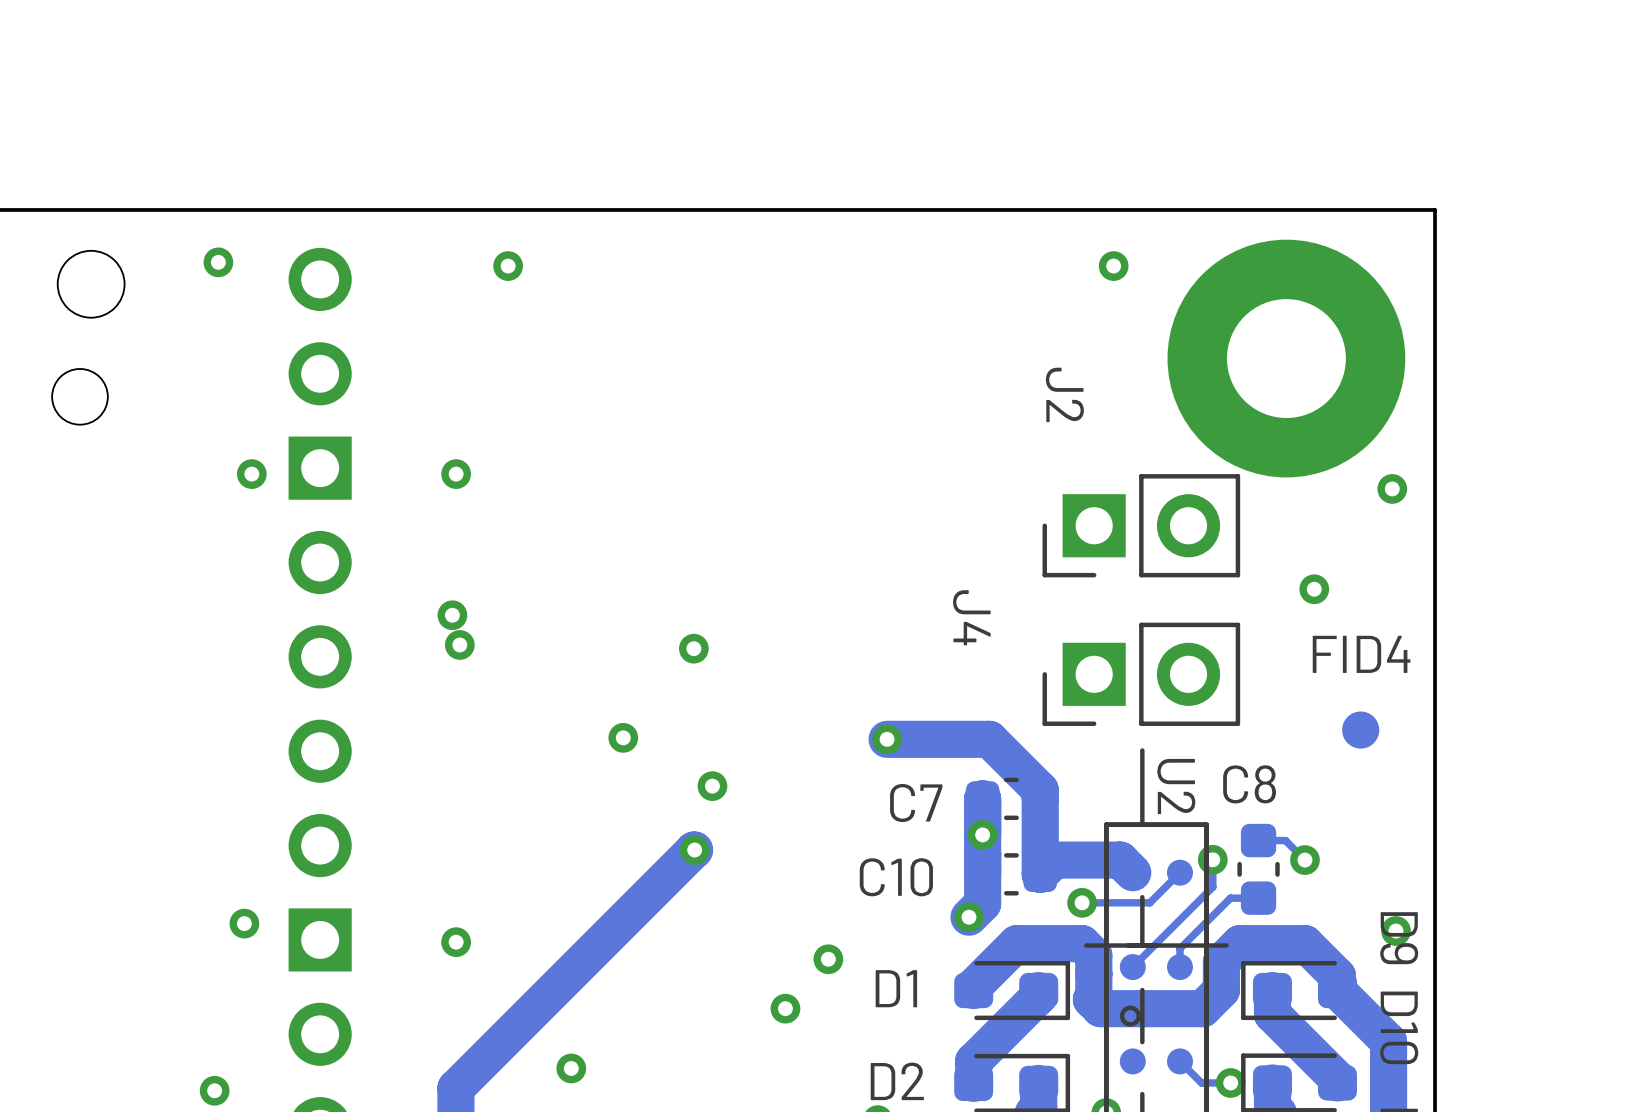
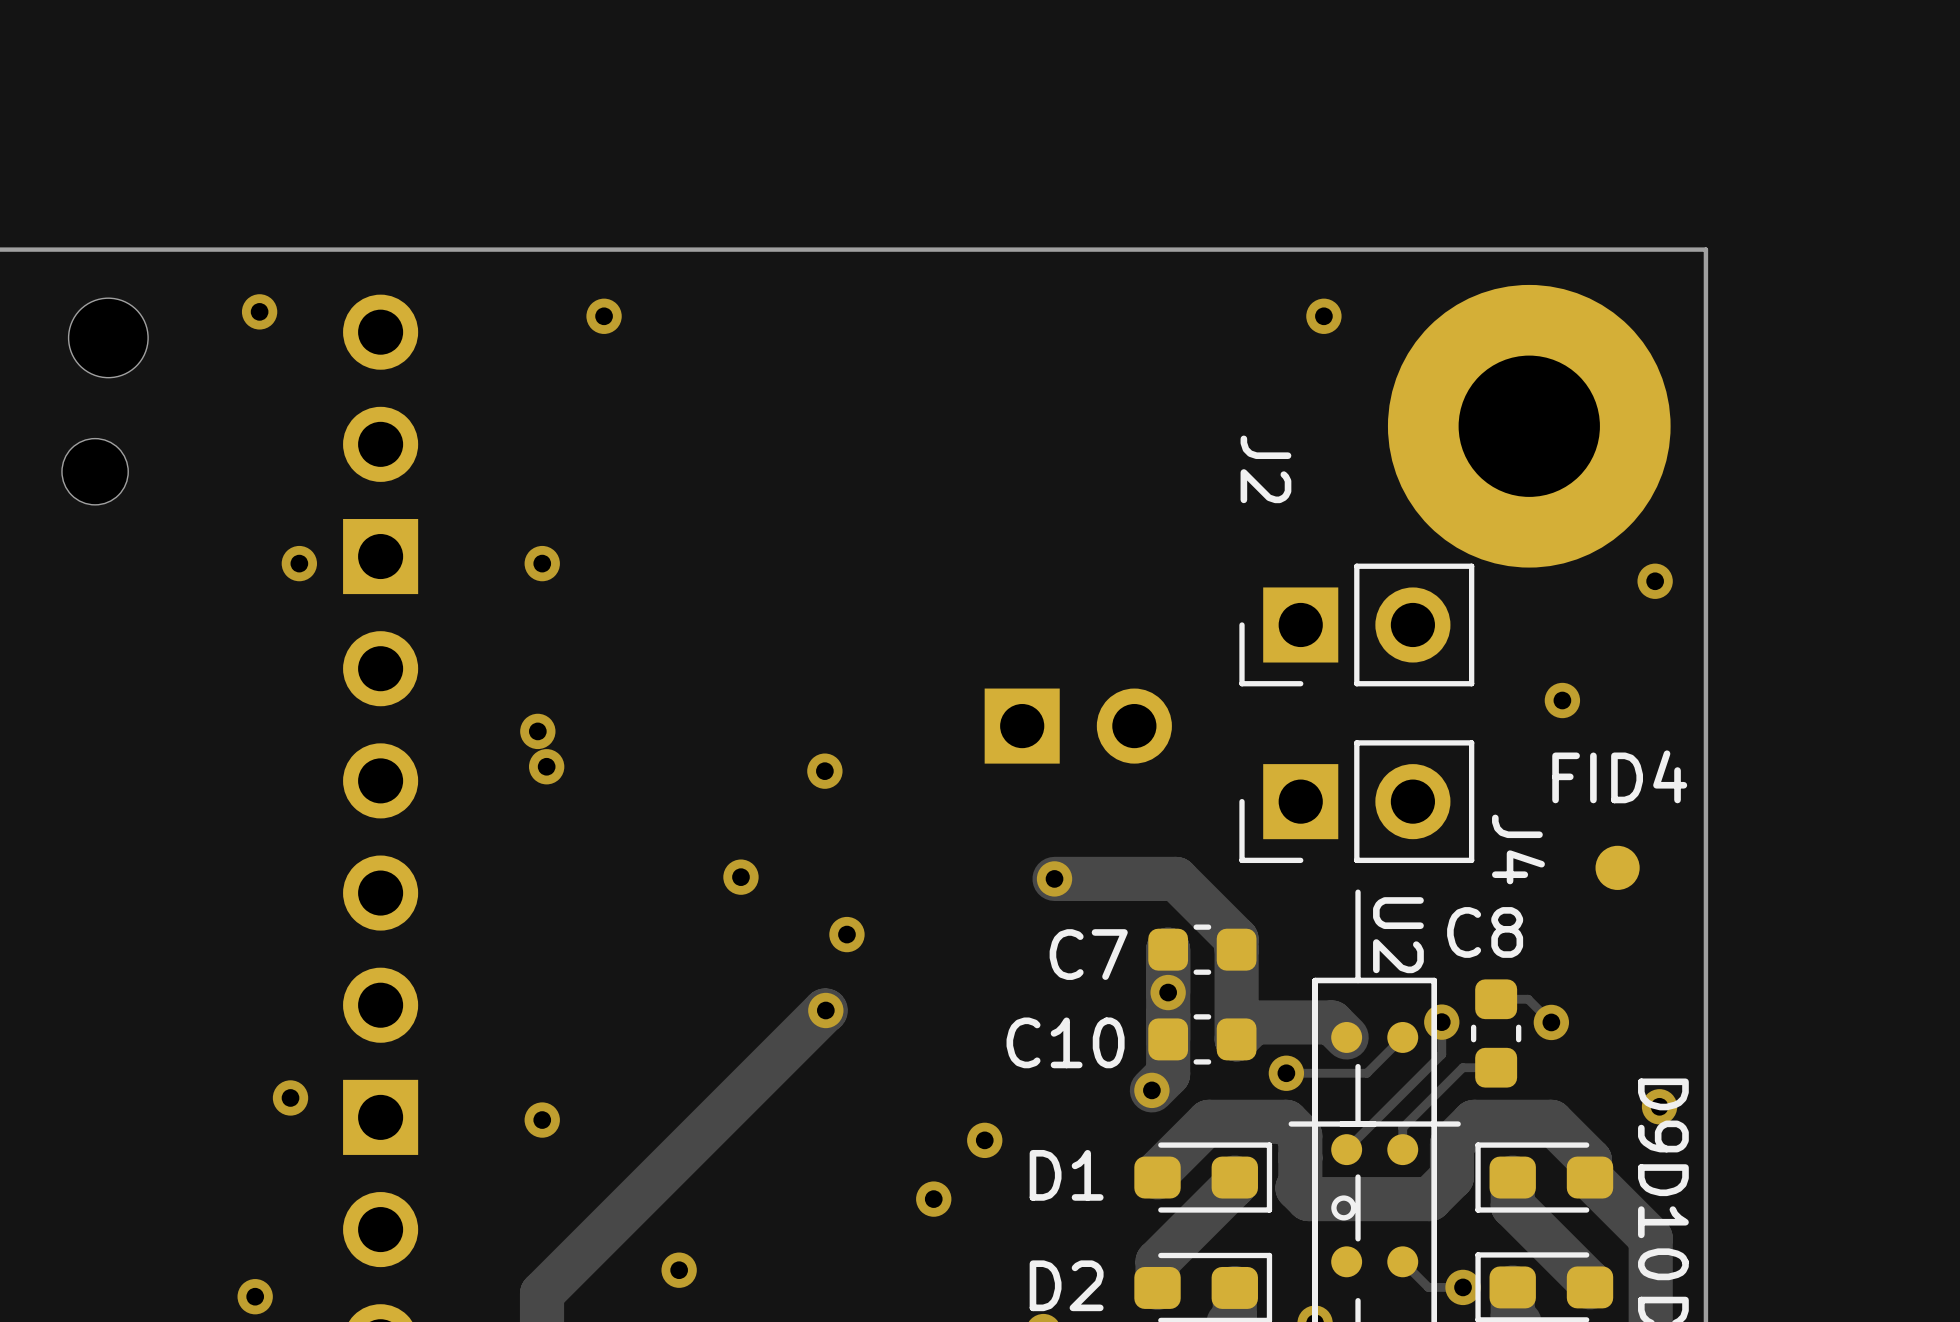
part: none -> (1078, 726)
J4 name position: J4 (971, 617) -> J4 (1518, 849)

